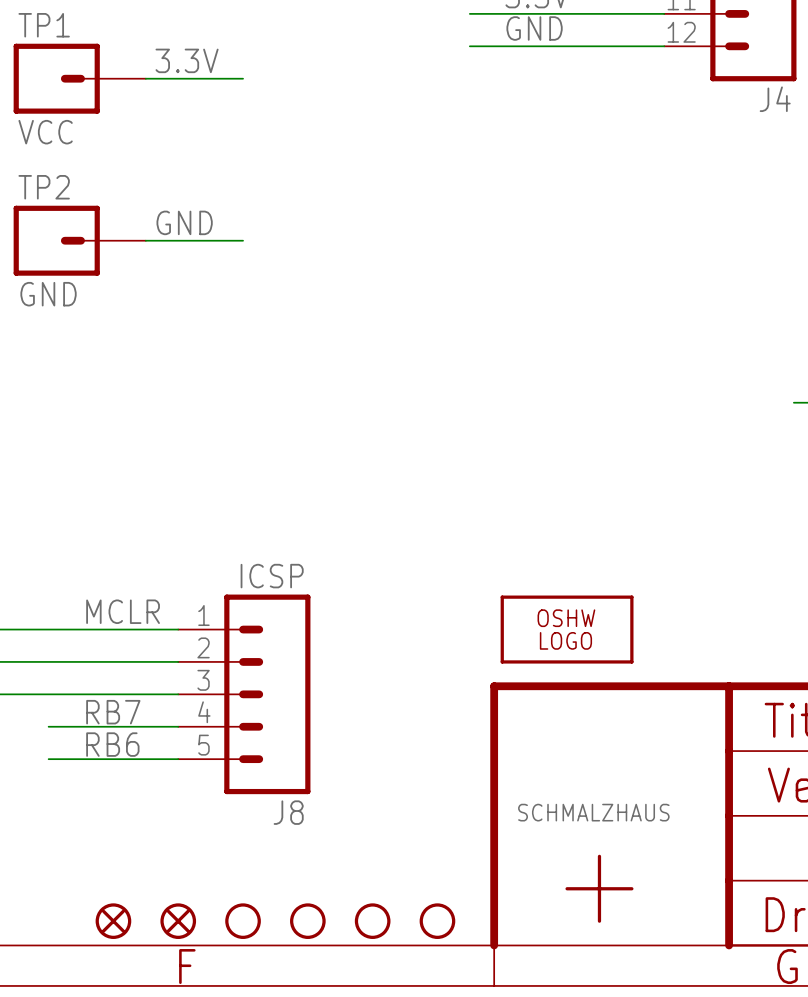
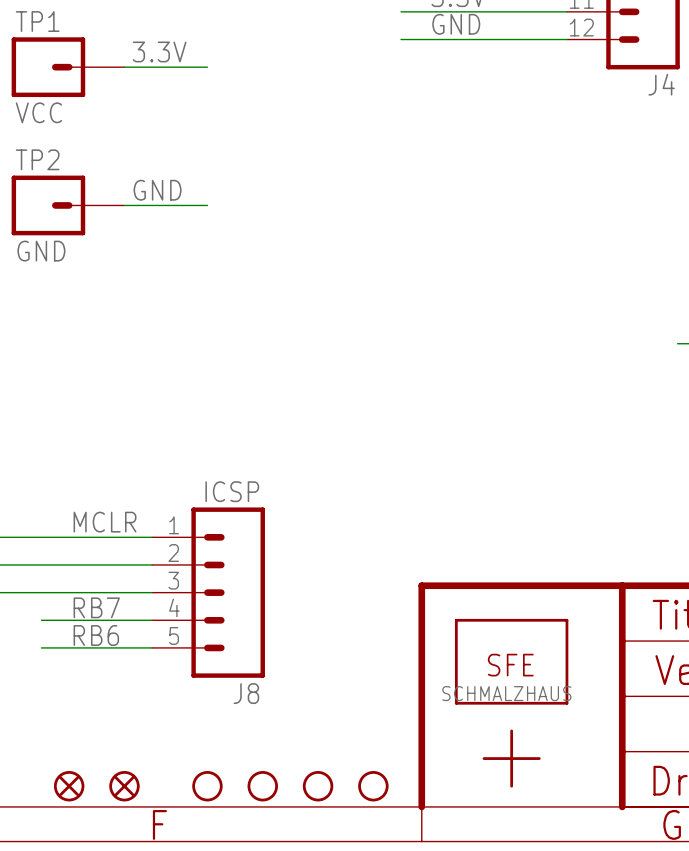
part: (567, 629) -> none
part: none -> (511, 661)
part: none -> (69, 786)
part: (113, 921) -> none
part: none -> (124, 786)
part: (178, 921) -> none

